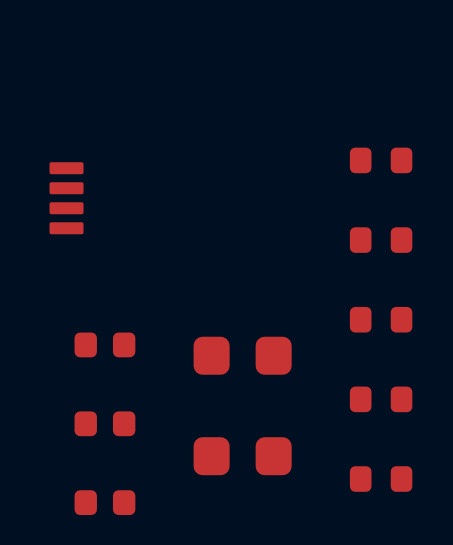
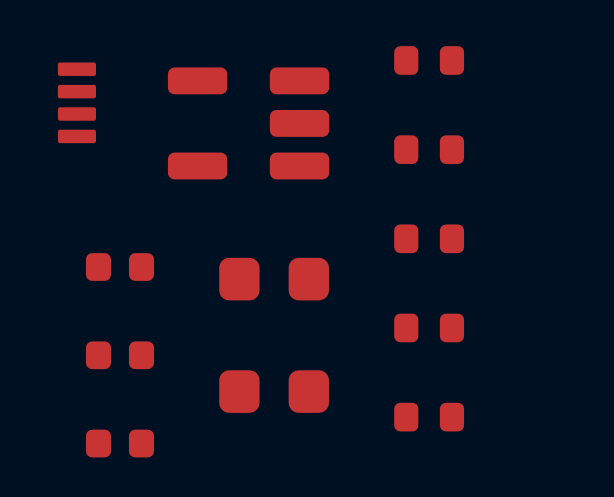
part: none -> (248, 123)

